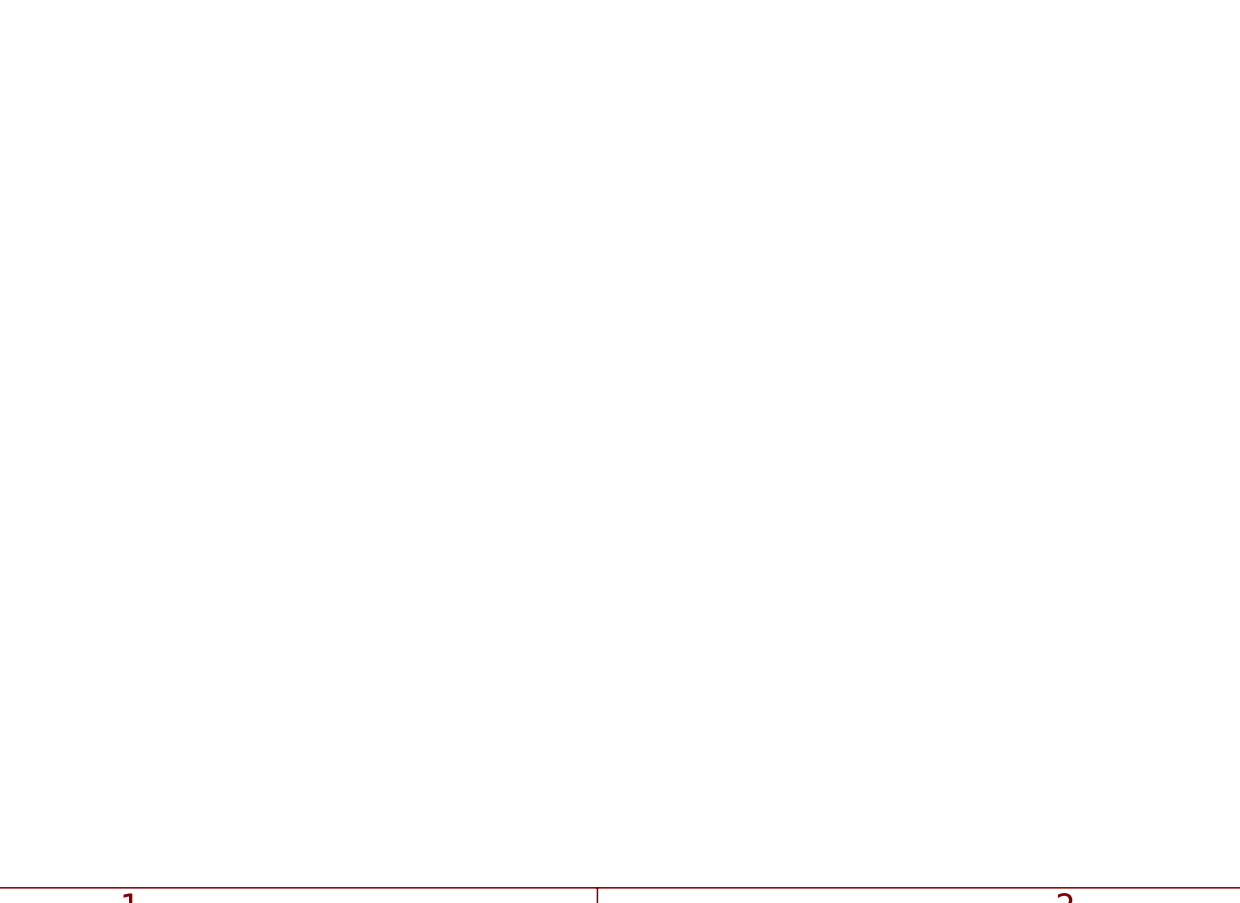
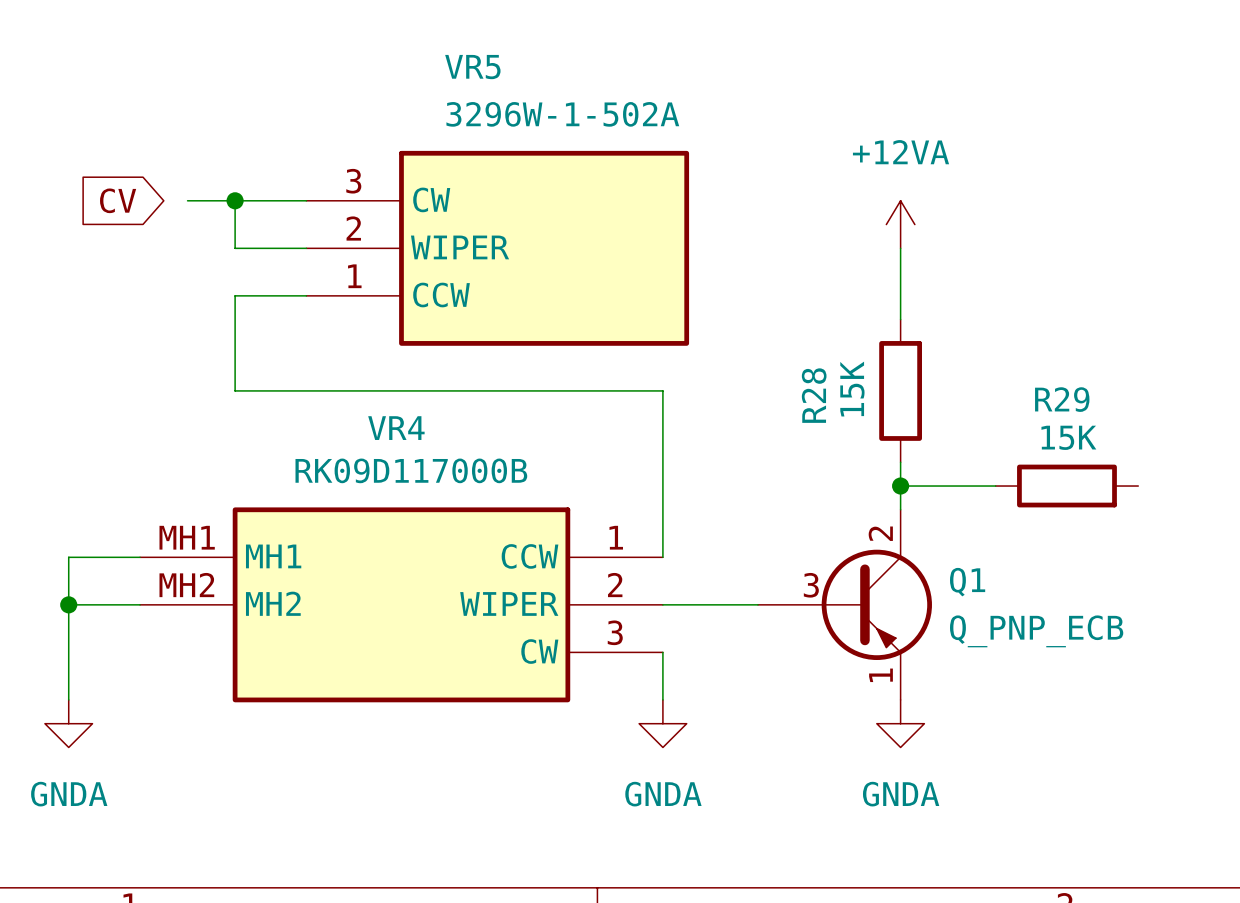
global label: none -> CV (118, 200)
wire: none -> (187, 200) (306, 200)
wire: none -> (235, 200) (235, 248) (306, 248)
junction: none -> (235, 200)
power symbol: none -> +12VA (900, 224)
VR5: none -> 3296W-1-502A (497, 248)
wire: none -> (900, 248) (900, 319)
wire: none -> (306, 295) (235, 295) (235, 390) (662, 390) (662, 557)
R28: none -> 15K (900, 390)
wire: none -> (900, 462) (900, 509)
wire: none -> (900, 486) (995, 486)
junction: none -> (900, 486)
R29: none -> 15K (1066, 486)
wire: none -> (140, 557) (68, 557) (68, 699)
wire: none -> (68, 604) (140, 604)
junction: none -> (68, 604)
VR4: none -> RK09D117000B (401, 604)
wire: none -> (662, 604) (757, 604)
Q1: none -> Q_PNP_ECB (844, 604)
wire: none -> (662, 652) (662, 699)
power symbol: none -> GNDA (68, 723)
power symbol: none -> GNDA (662, 723)
power symbol: none -> GNDA (900, 723)

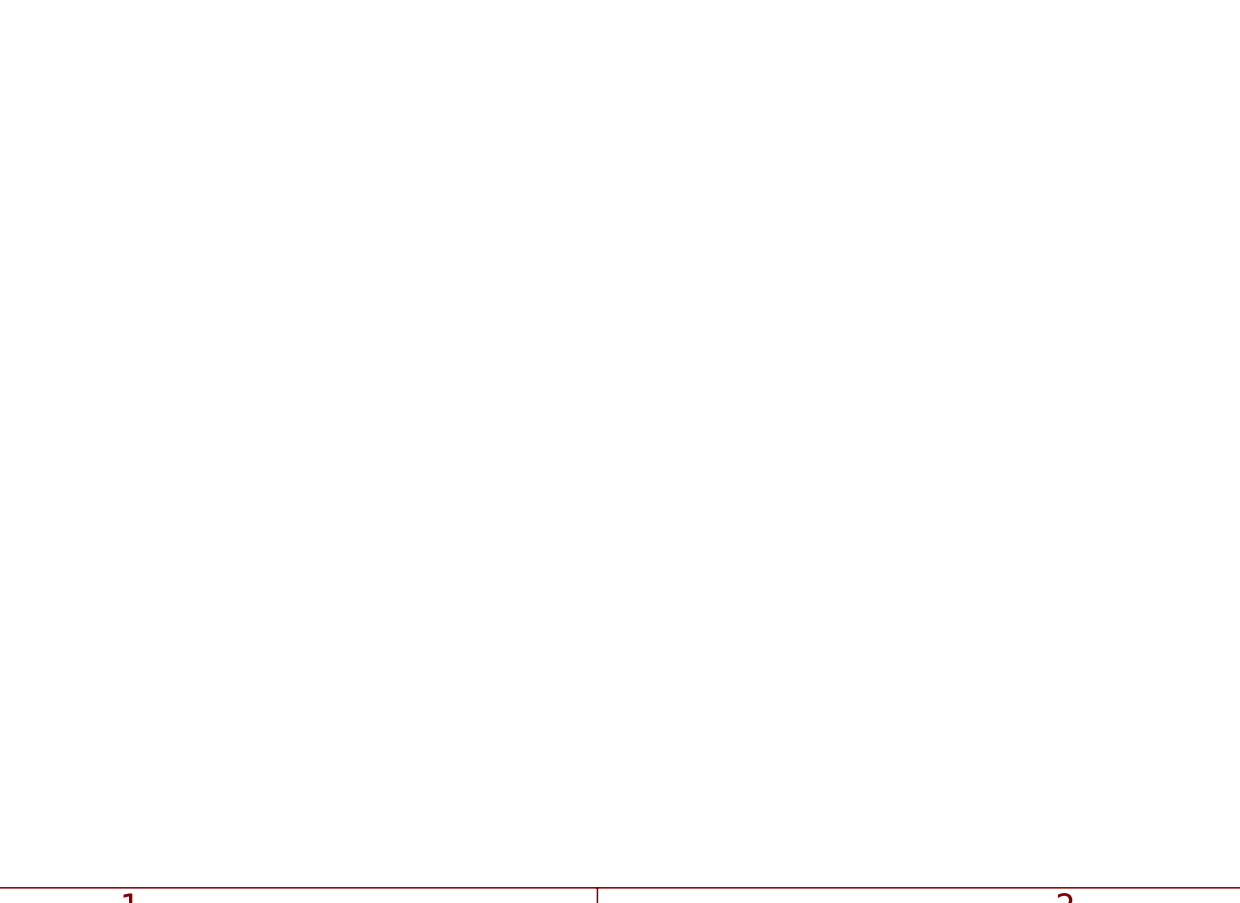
global label: CV (118, 200) -> none
wire: (187, 200) (306, 200) -> none
wire: (235, 200) (235, 248) (306, 248) -> none
junction: (235, 200) -> none
power symbol: +12VA (900, 224) -> none
VR5: 3296W-1-502A (497, 248) -> none
wire: (900, 248) (900, 319) -> none
wire: (306, 295) (235, 295) (235, 390) (662, 390) (662, 557) -> none
R28: 15K (900, 390) -> none
wire: (900, 462) (900, 509) -> none
wire: (900, 486) (995, 486) -> none
junction: (900, 486) -> none
R29: 15K (1066, 486) -> none
wire: (140, 557) (68, 557) (68, 699) -> none
wire: (68, 604) (140, 604) -> none
junction: (68, 604) -> none
VR4: RK09D117000B (401, 604) -> none
wire: (662, 604) (757, 604) -> none
Q1: Q_PNP_ECB (844, 604) -> none
wire: (662, 652) (662, 699) -> none
power symbol: GNDA (68, 723) -> none
power symbol: GNDA (662, 723) -> none
power symbol: GNDA (900, 723) -> none

